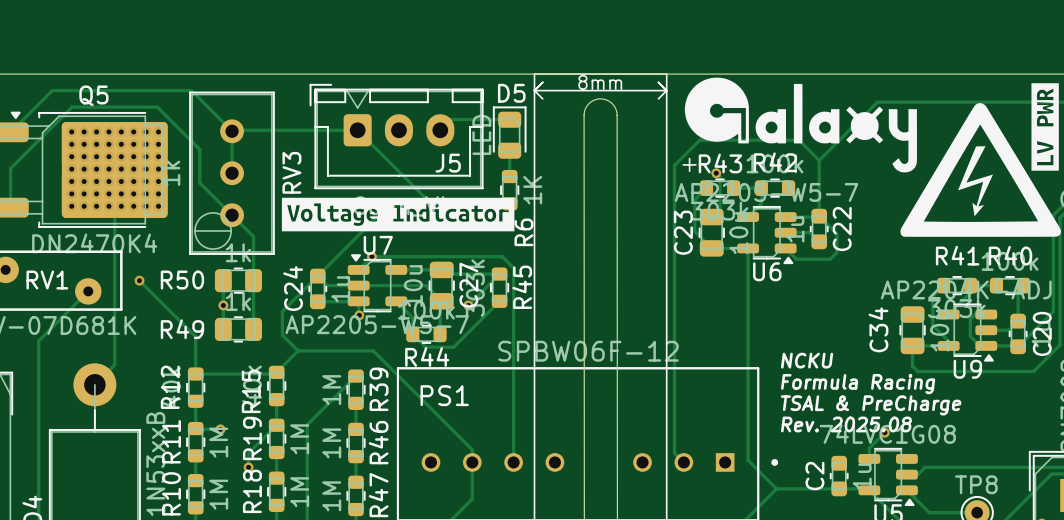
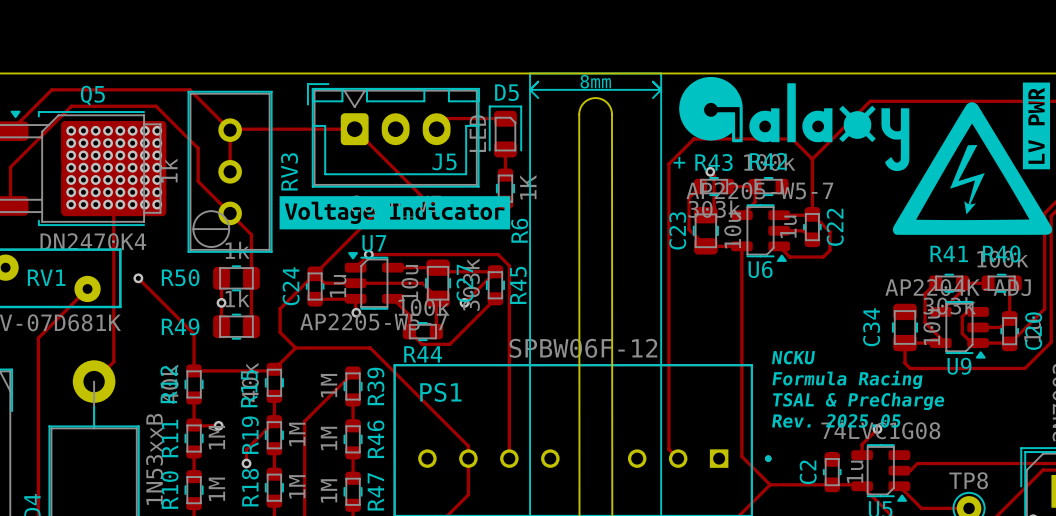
text: Rev. 2025.08 (846, 424) -> Rev. 2025.05 (836, 420)

